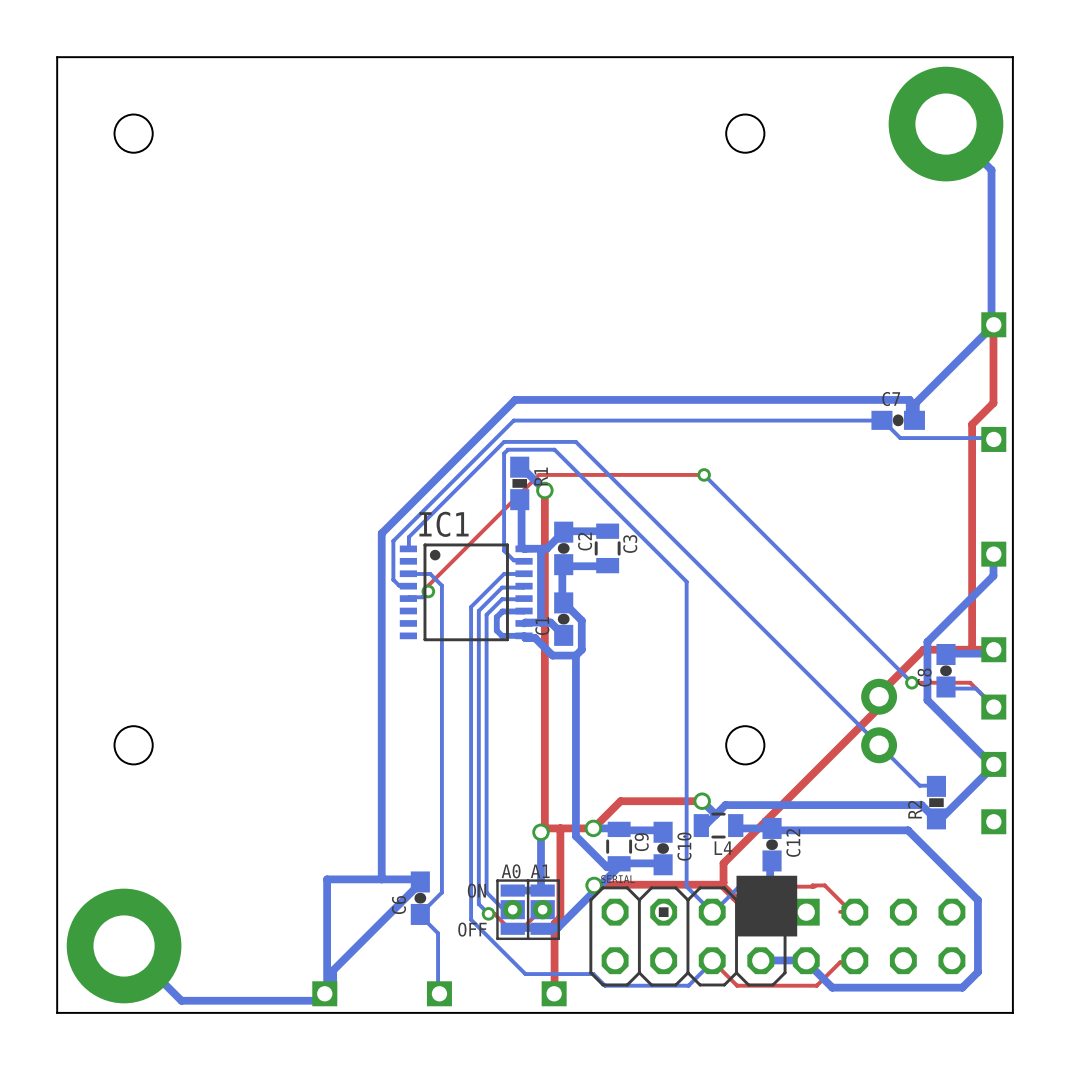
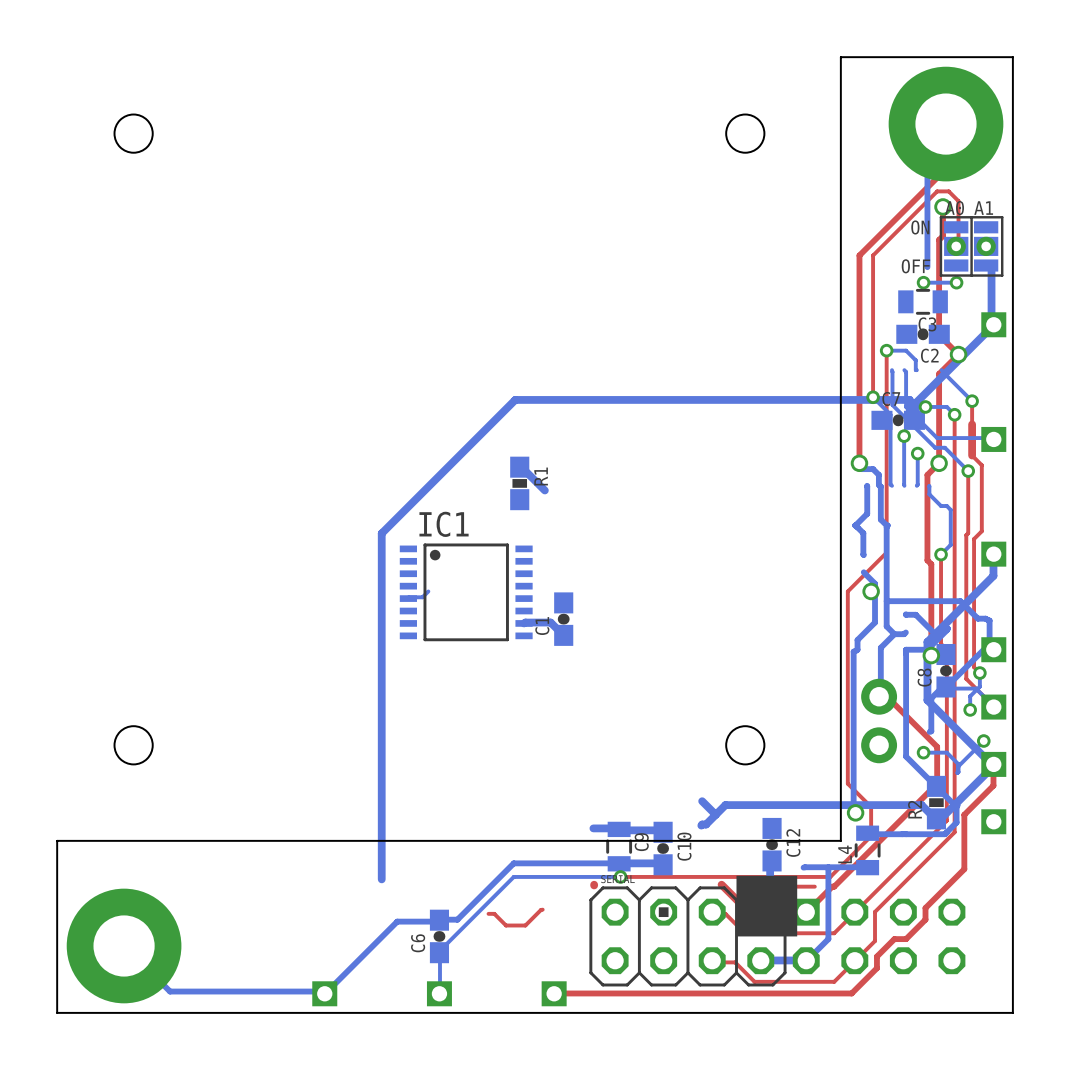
board edge: (840, 57) (57, 57) (57, 840) -> (840, 57) (840, 840) (57, 840)
bottom track: (945, 124) (991, 170) (991, 271) -> (945, 124) (927, 142) (927, 267)
top track: none -> (945, 124) (944, 170) (859, 255) (859, 463)
top track: none -> (942, 206) (942, 236) (939, 239) (939, 335) (958, 354) (939, 373) (939, 463) (927, 474) (927, 560) (931, 564) (931, 655)
via: none -> (942, 206)
top track: none -> (956, 246) (958, 243) (958, 201) (948, 191) (937, 191) (873, 255) (873, 397)
part: none -> (971, 246)
via: none -> (923, 282)
bottom track: none -> (956, 282) (923, 282)
via: none -> (956, 282)
top track: (993, 324) (993, 403) (972, 424) -> (972, 401) (972, 424)
bottom track: none -> (886, 350) (906, 350) (915, 360) (916, 370)
top track: none -> (886, 350) (886, 552) (847, 591) (847, 783) (871, 807) (871, 836) (830, 876) (620, 876)
via: none -> (886, 350)
via: none -> (958, 354)
bottom track: none -> (891, 370) (892, 405) (935, 447) (944, 447) (968, 471)
bottom track: none -> (941, 370) (972, 401)
bottom track: none -> (873, 397) (890, 414) (891, 485)
via: none -> (873, 397)
via: none -> (972, 401)
bottom track: none -> (925, 406) (946, 406) (954, 414)
via: none -> (925, 406)
top track: none -> (954, 414) (954, 832) (875, 911) (875, 941) (854, 960)
via: none -> (954, 414)
bottom track: none -> (904, 436) (904, 485)
via: none -> (904, 436)
bottom track: (937, 438) (900, 438) (881, 420) (513, 420) (393, 540) (393, 579) (399, 585) (408, 586) -> (937, 438) (906, 406) (906, 372) (904, 370)
bottom track: none -> (917, 453) (916, 485)
via: none -> (917, 453)
top track: (972, 455) (972, 649) -> (972, 455) (981, 465) (981, 531) (974, 539) (974, 667) (979, 673)
bottom track: none -> (859, 463) (861, 469) (873, 469) (878, 474) (880, 519) (887, 525) (886, 626) (894, 634)
via: none -> (859, 463)
via: none -> (939, 463)
via: none -> (968, 471)
bottom track: (704, 474) (911, 682) -> none
top track: (704, 474) (539, 474) (428, 585) (428, 591) -> none
via: (704, 474) -> none
bottom track: none -> (867, 485) (867, 513) (855, 525) (863, 533) (863, 555)
bottom track: none -> (929, 485) (929, 494) (941, 506) (946, 506) (950, 509) (950, 544) (941, 554)
top track: (544, 490) (544, 828) -> none
via: (544, 490) -> none
bottom track: (519, 499) (521, 500) (521, 546) (524, 548) (546, 548) (566, 531) (607, 531) -> none
bottom track: (408, 548) (408, 537) (504, 441) (575, 441) (919, 785) (936, 786) -> none
bottom track: (540, 548) (540, 622) -> none
C2 rotation: 0° (563, 548) -> 90° clockwise (923, 334)
C2 position: (563, 548) -> (923, 334)
C3 rotation: 0° (607, 548) -> 90° clockwise (923, 301)
C3 position: (607, 548) -> (923, 301)
top track: none -> (941, 554) (941, 643) (946, 649) (946, 820) (834, 933) (744, 933) (725, 913) (712, 912)
via: none -> (941, 554)
bottom track: (524, 561) (513, 560) (504, 550) (504, 453) (507, 449) (554, 449) (686, 581) (686, 886) (712, 912) (739, 886) (744, 886) -> none
bottom track: (607, 565) (566, 566) (563, 564) (562, 566) (562, 601) (581, 620) (581, 649) (575, 655) -> none
bottom track: none -> (863, 572) (875, 583) (875, 622) (857, 640) (857, 649) (853, 651) (853, 810) (855, 812)
bottom track: (408, 573) (430, 573) (441, 585) (441, 892) (420, 914) (438, 933) (439, 993) -> (620, 876) (513, 876) (439, 950) (439, 993)
bottom track: (524, 573) (504, 573) (471, 607) (471, 919) (525, 974) (593, 974) (605, 985) (688, 985) (712, 960) -> none
bottom track: (524, 586) (502, 587) (478, 610) (478, 904) (488, 913) -> none
via: (428, 591) -> none
via: none -> (871, 591)
bottom track: (524, 598) (502, 599) (486, 614) (486, 892) (504, 909) (511, 909) -> none
bottom track: none -> (886, 601) (960, 601) (977, 618) (989, 620) (989, 643) (993, 649) (987, 645) (950, 682) (946, 682) (931, 698) (931, 731) (929, 731)
bottom track: (524, 611) (502, 611) (496, 617) (496, 630) (502, 635) (535, 638) (552, 655) (575, 655) -> none
bottom track: none -> (905, 614) (915, 614) (937, 636) (947, 628) (927, 649) (906, 649) (906, 756) (954, 805) (957, 805) (956, 822) (944, 834) (867, 833)
bottom track: none -> (905, 632) (894, 634)
bottom track: none -> (894, 634) (880, 647) (880, 696) (879, 696)
bottom track: (993, 649) (989, 653) (945, 654) -> none
top track: (993, 649) (923, 649) (880, 692) (878, 707) (723, 863) (723, 882) (721, 884) (589, 884) -> none
bottom track: (575, 655) (575, 836) (607, 867) (619, 863) (618, 867) (557, 927) (512, 928) -> none
via: none -> (931, 655)
bottom track: none -> (979, 673) (979, 686) (970, 696) (970, 709)
via: none -> (979, 673)
via: (911, 682) -> none
top track: (970, 682) (911, 682) -> (970, 682) (966, 678) (968, 471)
top track: none -> (879, 696) (888, 698) (937, 746) (937, 783) (806, 912)
via: none -> (970, 709)
bottom track: none -> (983, 741) (958, 766) (957, 773) (958, 764) (946, 752) (923, 752)
via: none -> (983, 741)
via: none -> (923, 752)
top track: (702, 801) (620, 801) (593, 828) (544, 828) -> none
via: (702, 801) -> none
via: none -> (855, 812)
L4 rotation: 0° (718, 825) -> 90° clockwise (867, 850)
L4 position: (718, 825) -> (867, 850)
bottom track: (735, 825) (739, 828) (772, 828) (774, 830) (908, 830) (977, 900) (977, 972) (962, 987) (832, 987) (806, 960) -> (828, 867) (828, 939) (806, 960)
top track: (560, 828) (560, 917) (554, 923) (554, 993) -> (993, 764) (993, 785) (964, 814) (964, 869) (925, 908) (925, 919) (906, 939) (894, 939) (876, 956) (876, 968) (851, 993) (554, 993)
via: (593, 828) -> none
bottom track: (540, 832) (540, 886) (542, 890) (512, 890) -> none
via: (540, 832) -> none
bottom track: none -> (867, 867) (803, 867)
via: none -> (620, 876)
via: (594, 885) -> none
top track: (812, 886) (824, 885) (849, 909) (854, 912) (840, 911) -> none
C6 position: (420, 898) -> (439, 936)
part: (528, 909) -> none
via: (488, 913) -> none
bottom track: (124, 945) (126, 946) (181, 1000) (333, 1000) (333, 970) (418, 885) (420, 881) (418, 879) (327, 879) (327, 988) (324, 993) -> (124, 945) (170, 991) (323, 991) (324, 993) (397, 921) (457, 919) (513, 863) (620, 863)
top track: (853, 962) (840, 962) (816, 985) (737, 985) (713, 962) -> (853, 962) (834, 981) (754, 981) (735, 962) (713, 962)

